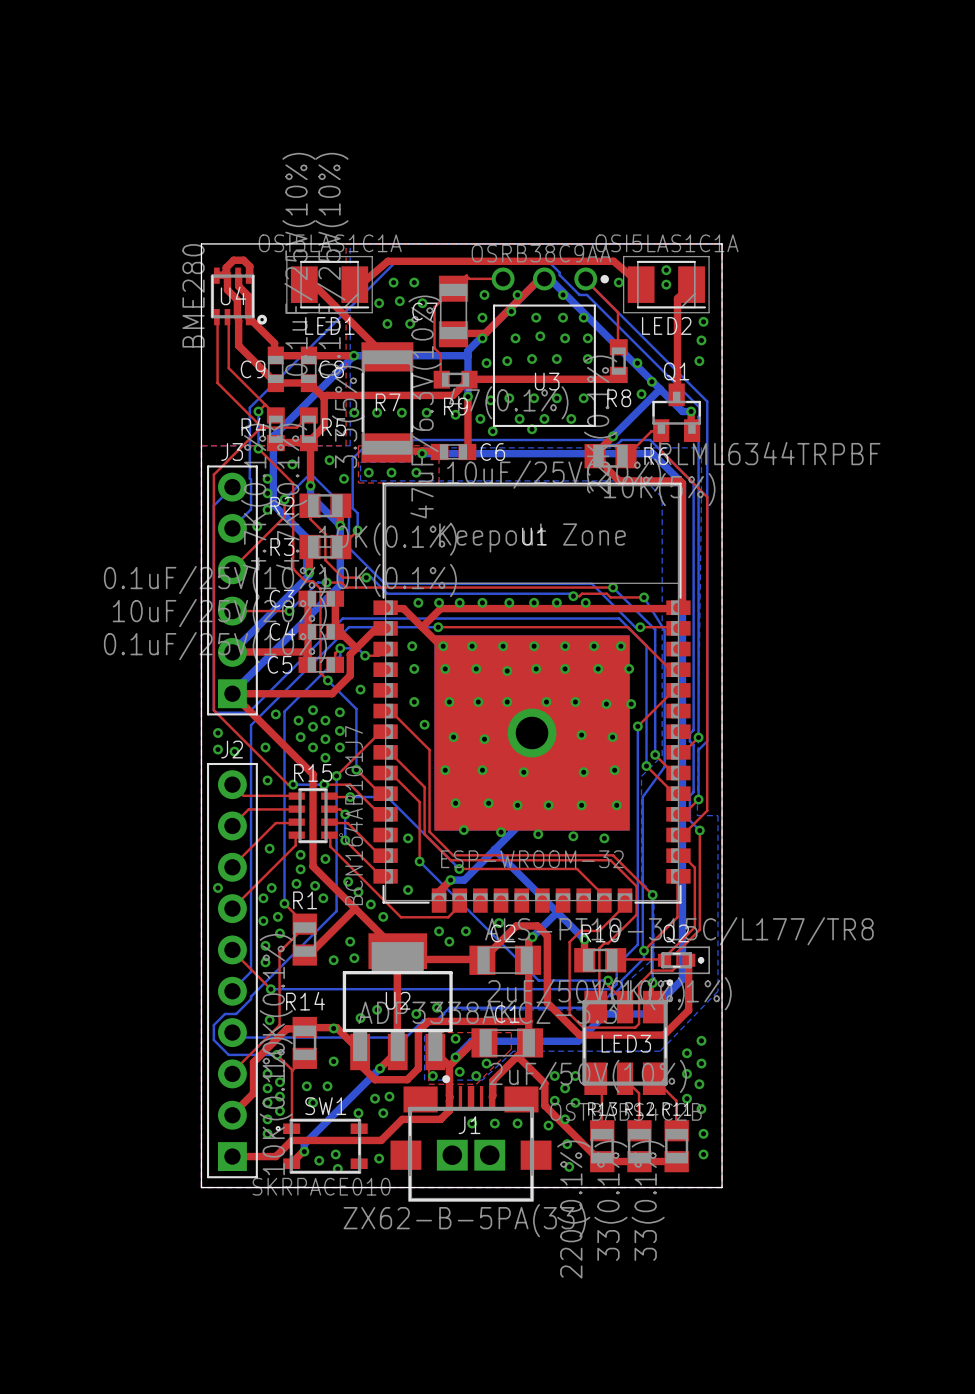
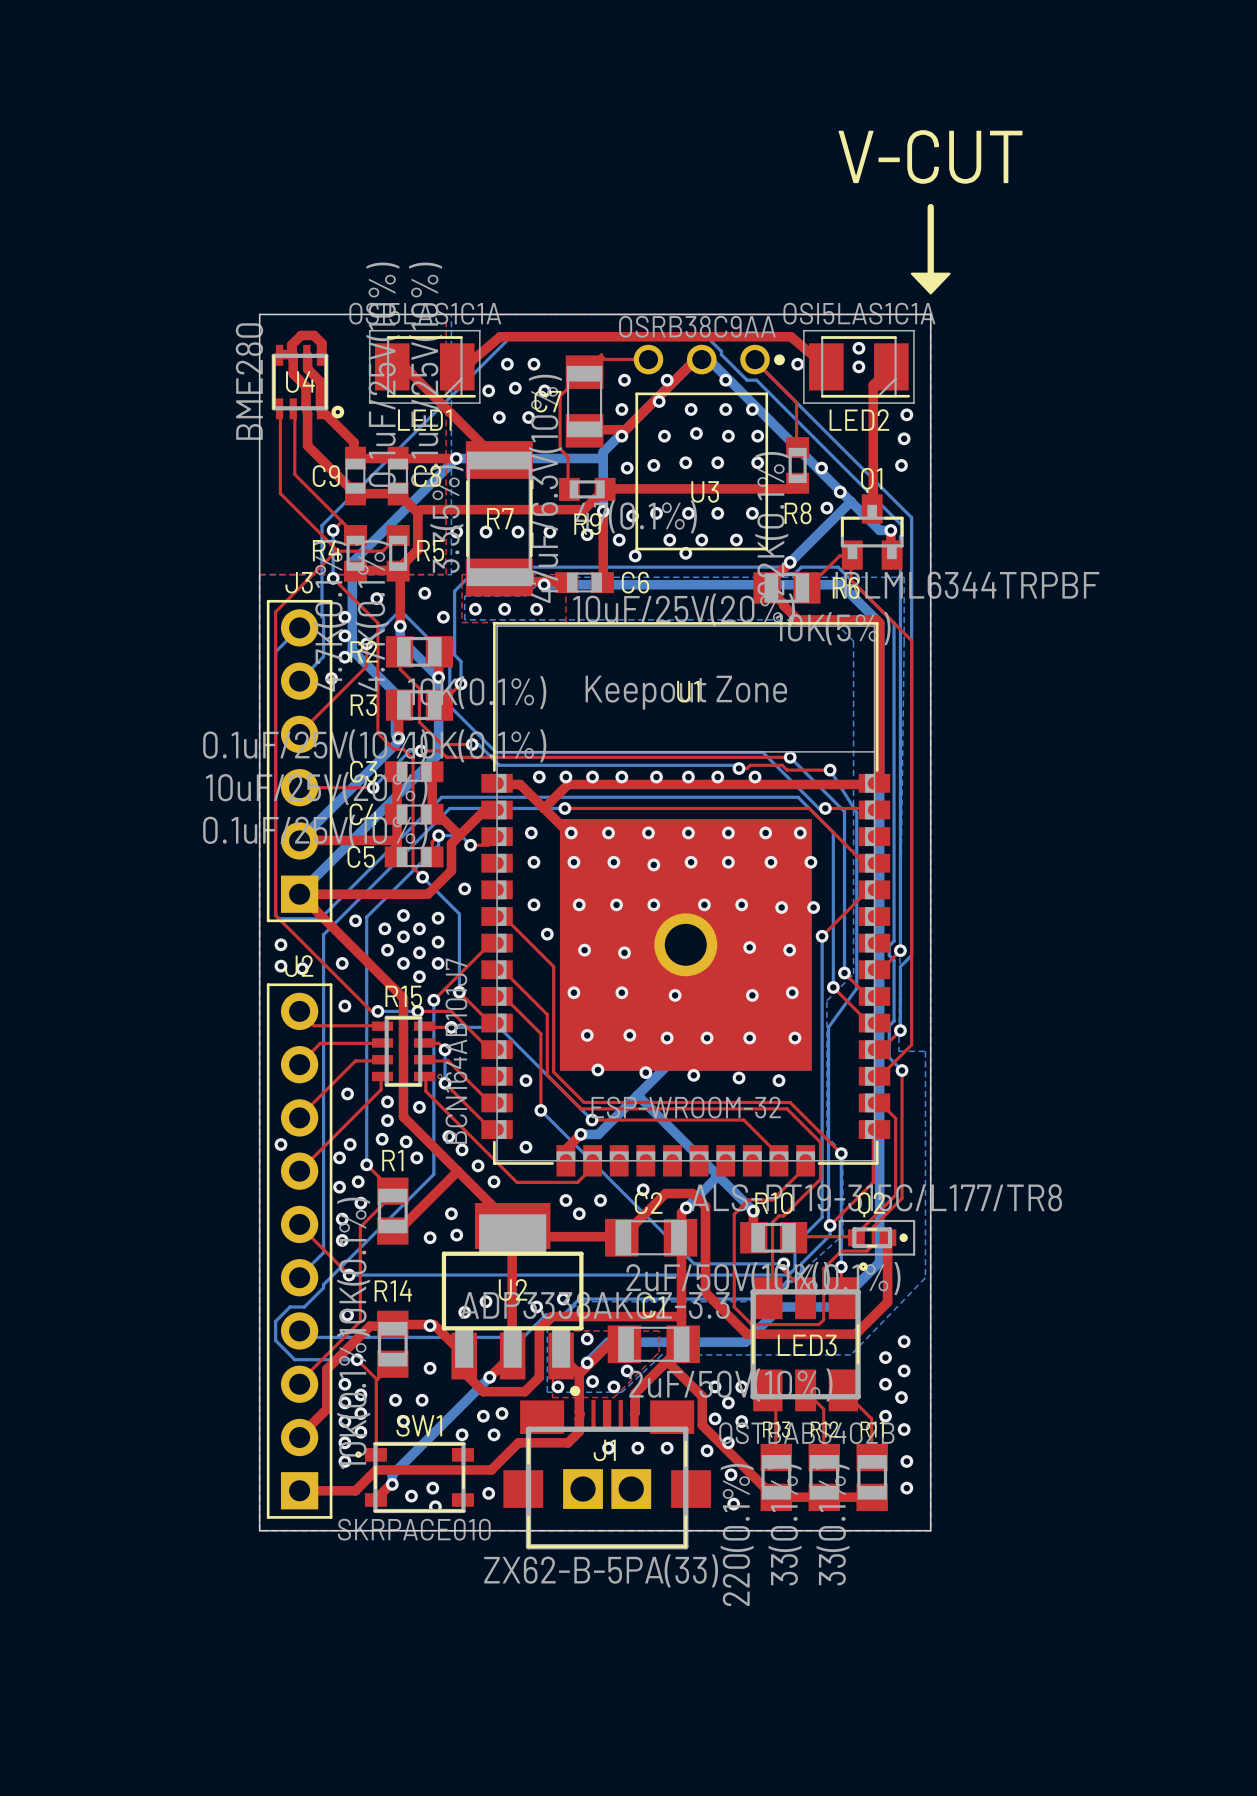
text: none -> V-CUT (930, 156)
line: none -> (930, 207) (930, 281)
drawing: none -> [910, 272, 951, 295]

